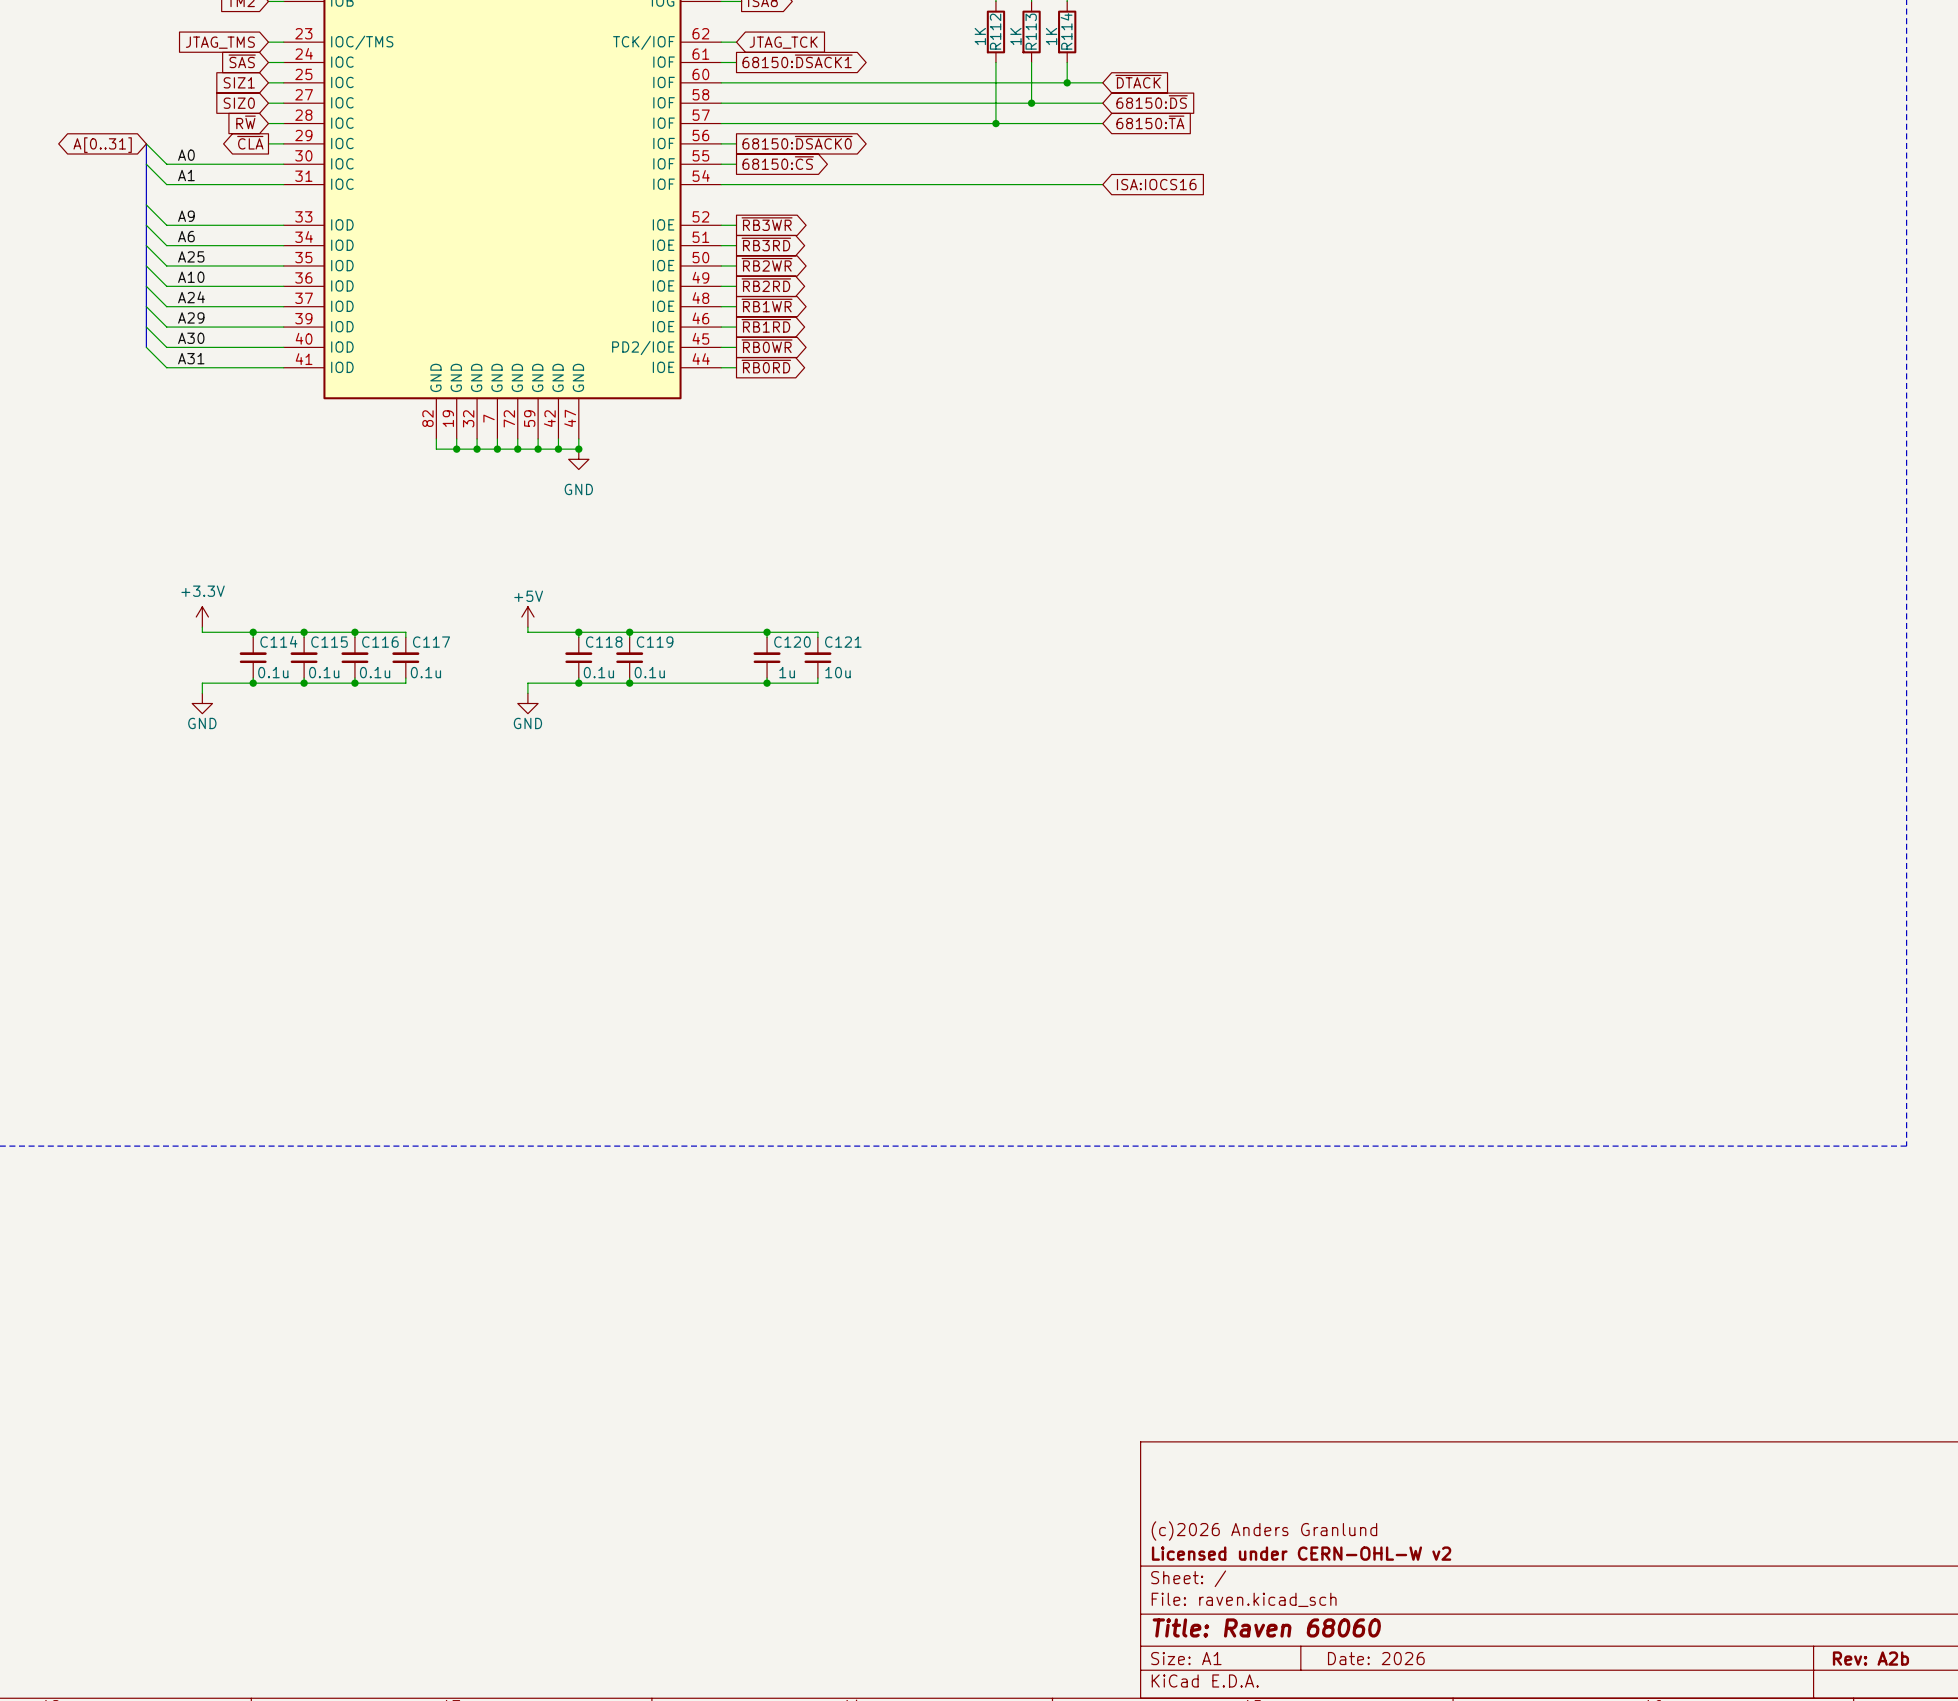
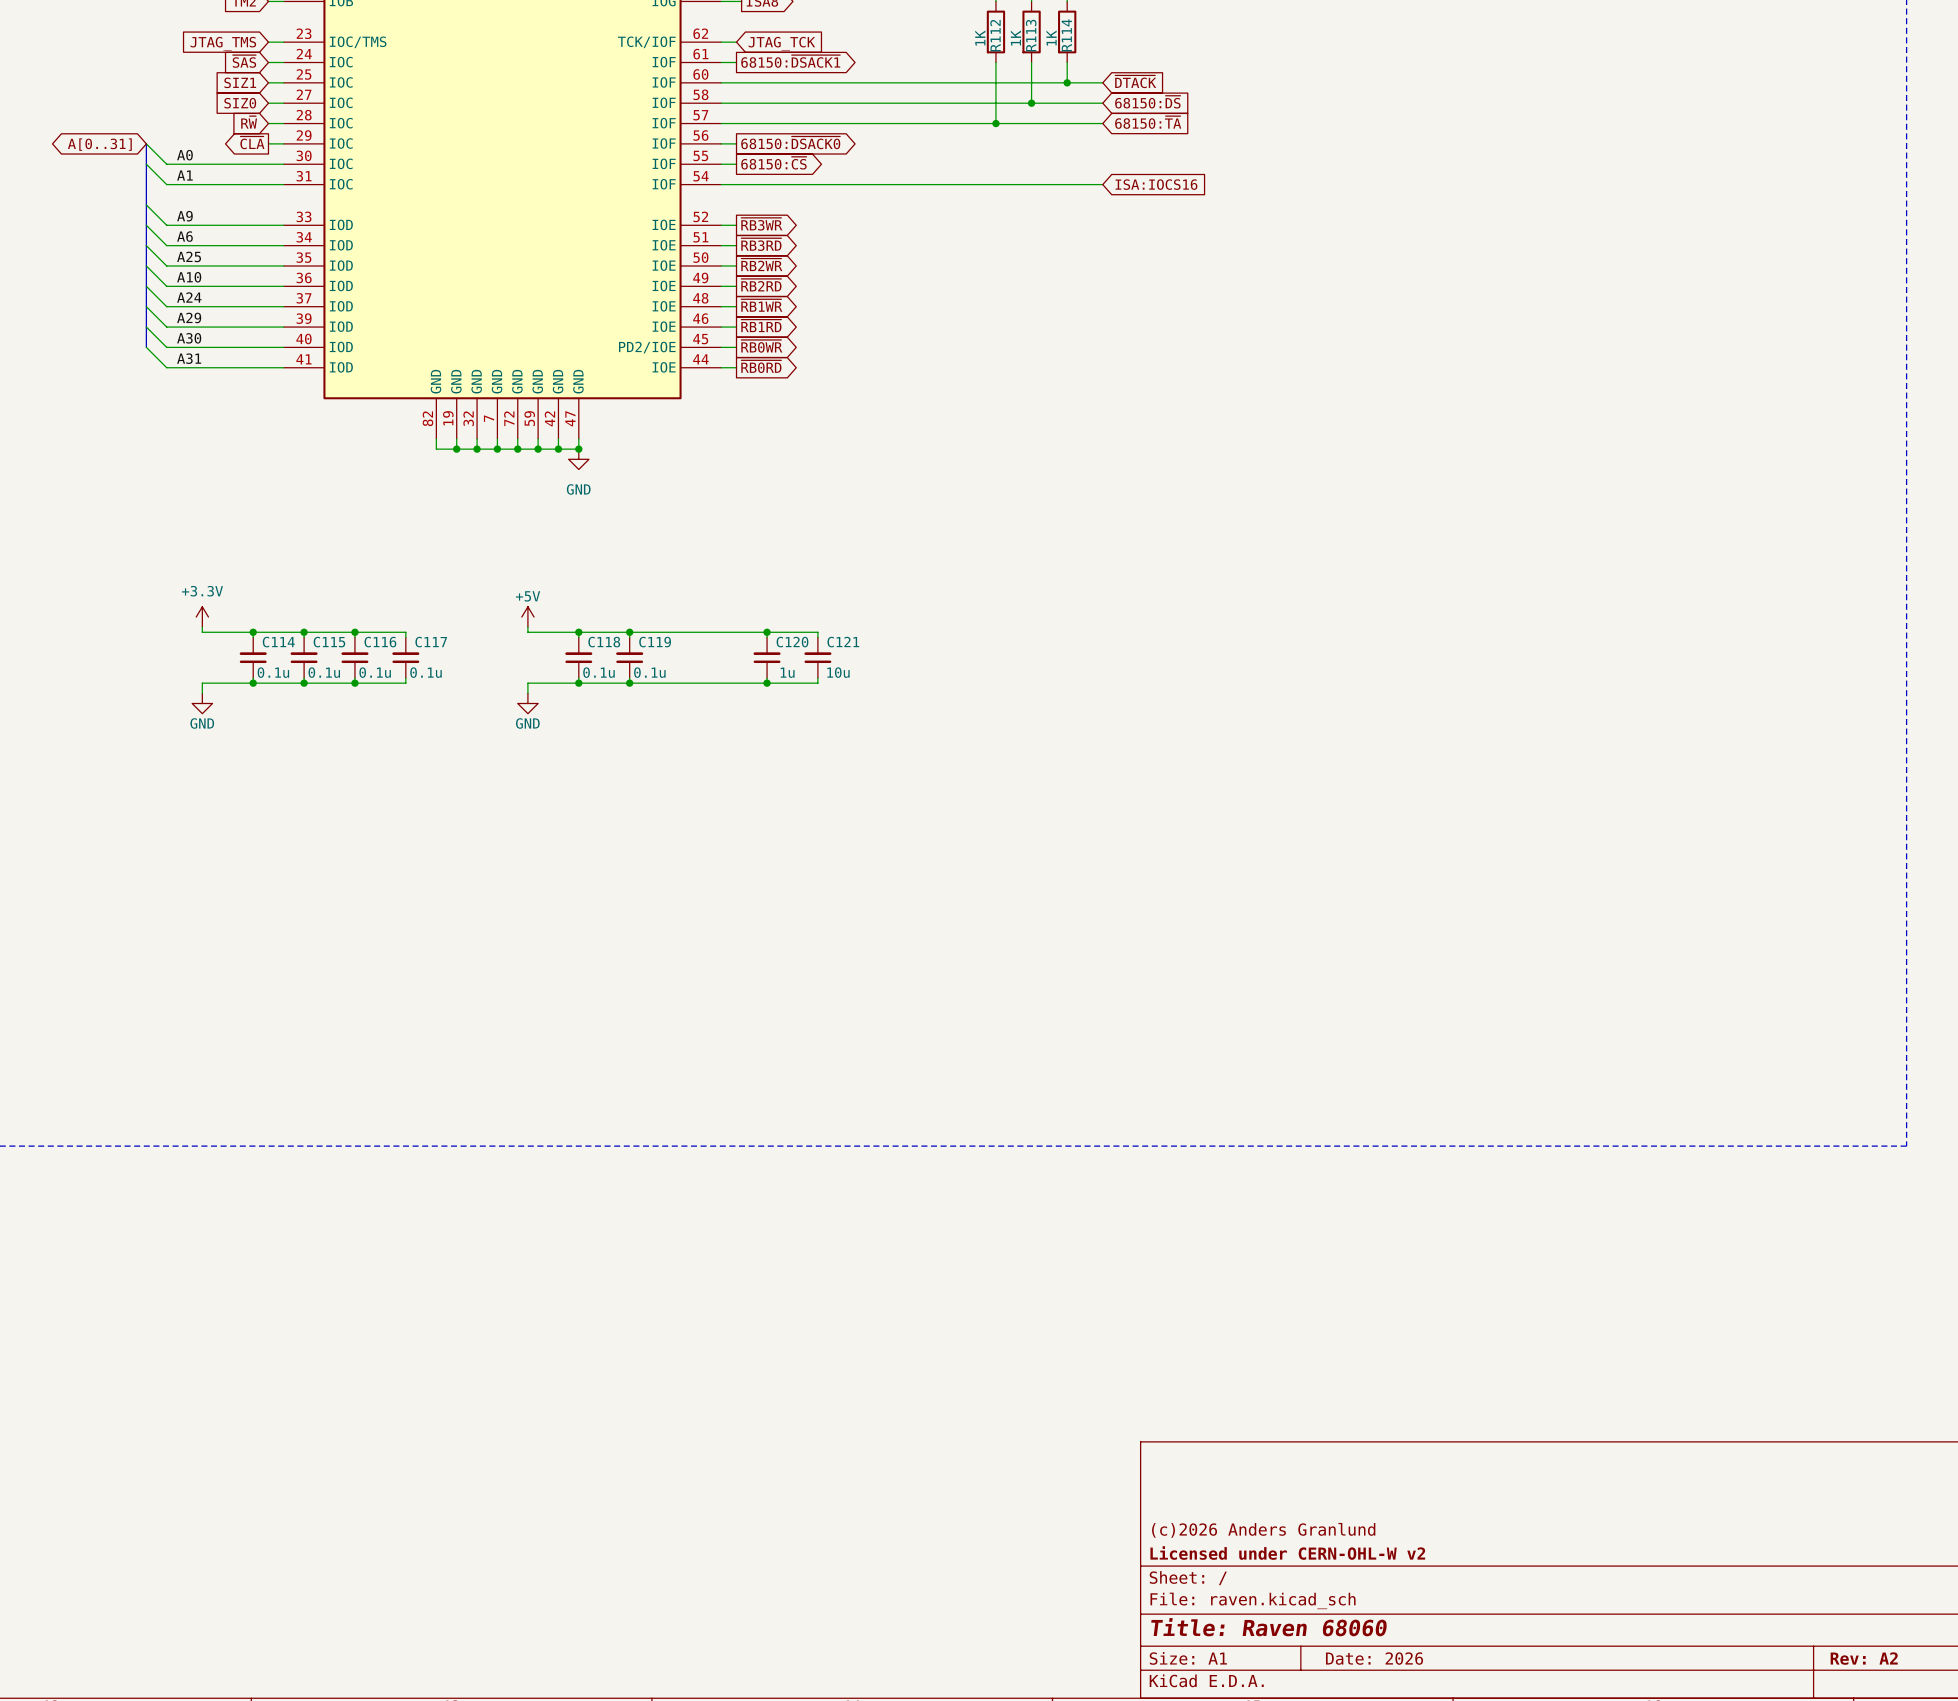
title block: Rev: A2b (1870, 1658) -> Rev: A2 (1864, 1658)

